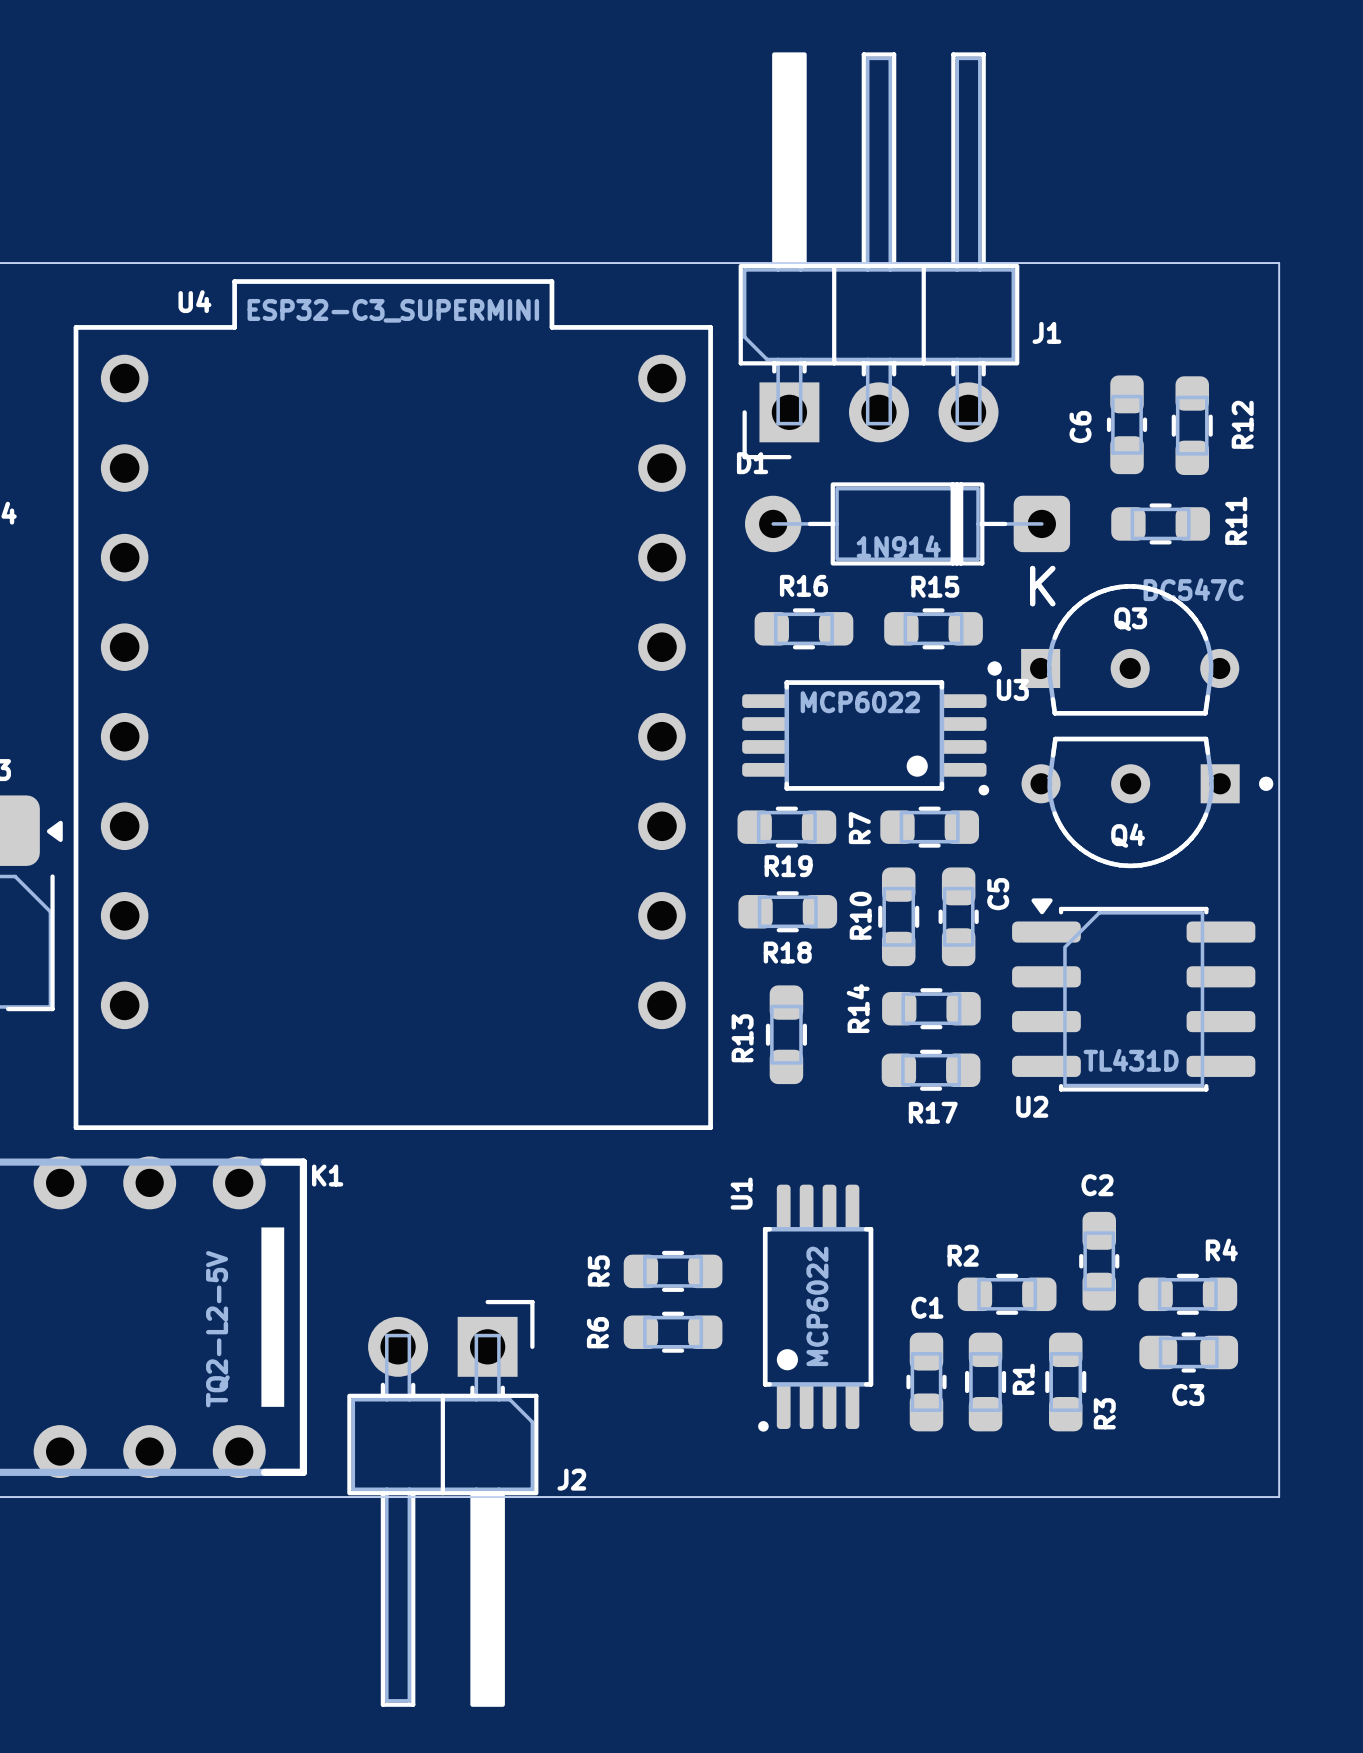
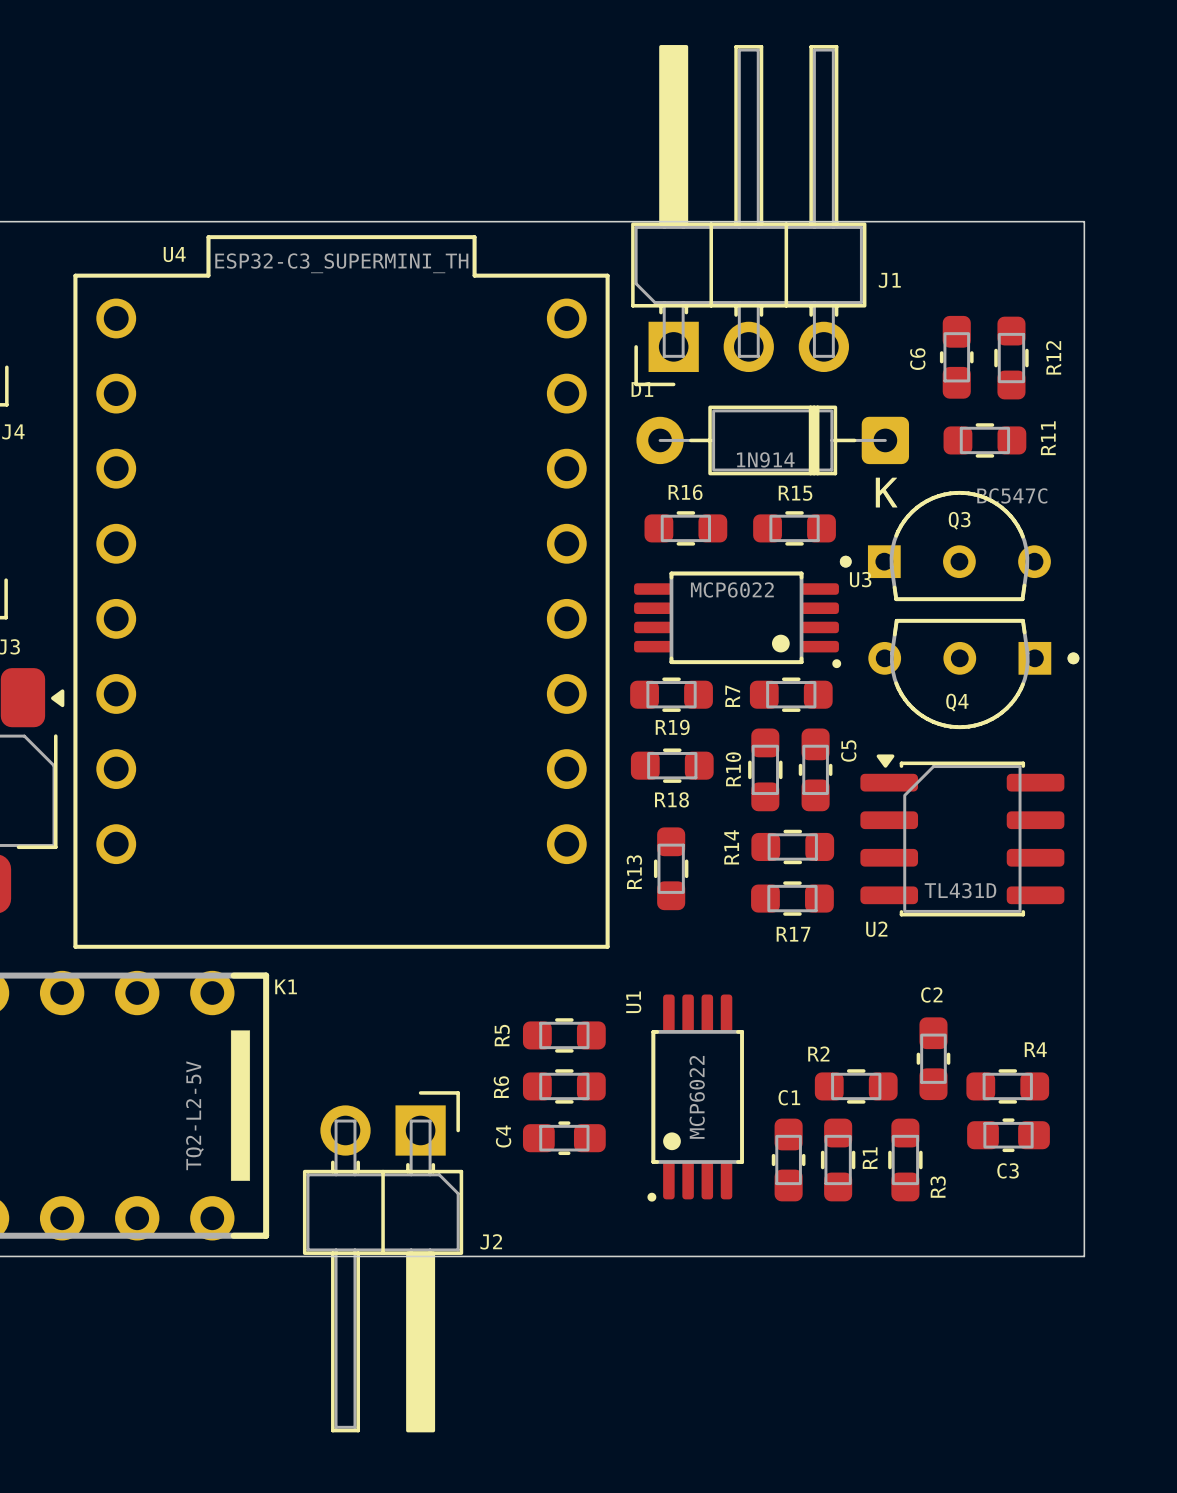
U4 value: ESP32-C3_SUPERMINI (393, 310) -> ESP32-C3_SUPERMINI_TH (341, 263)
R5 position: (673, 1271) -> (564, 1035)
R6 position: (673, 1332) -> (564, 1086)
C4: none -> (564, 1138)

